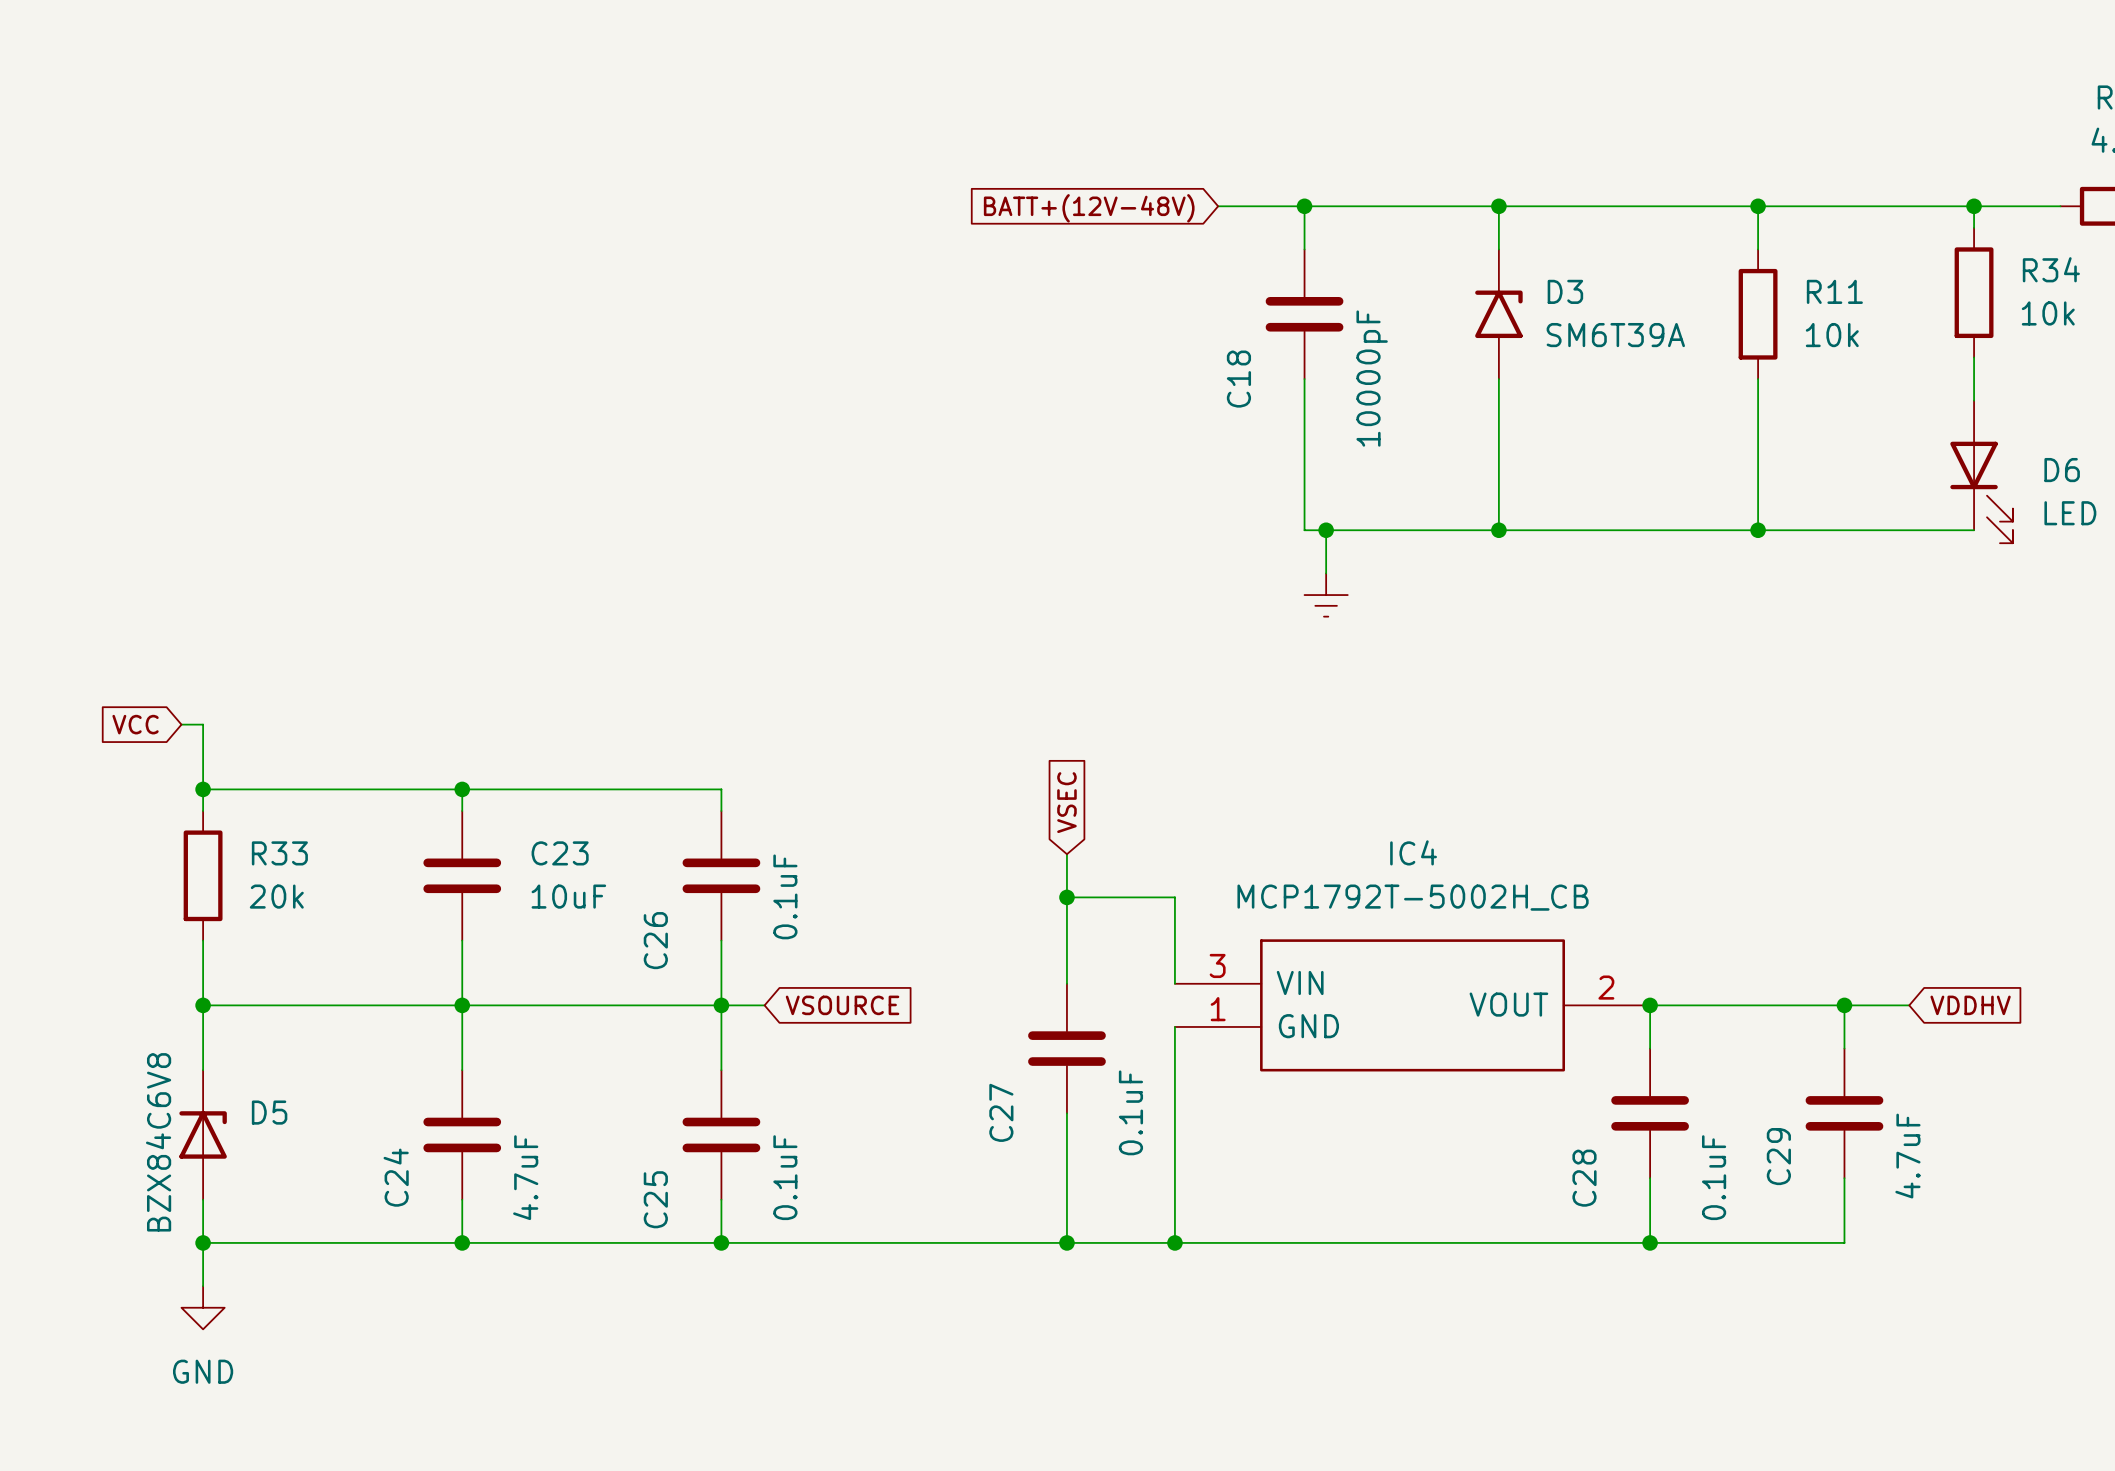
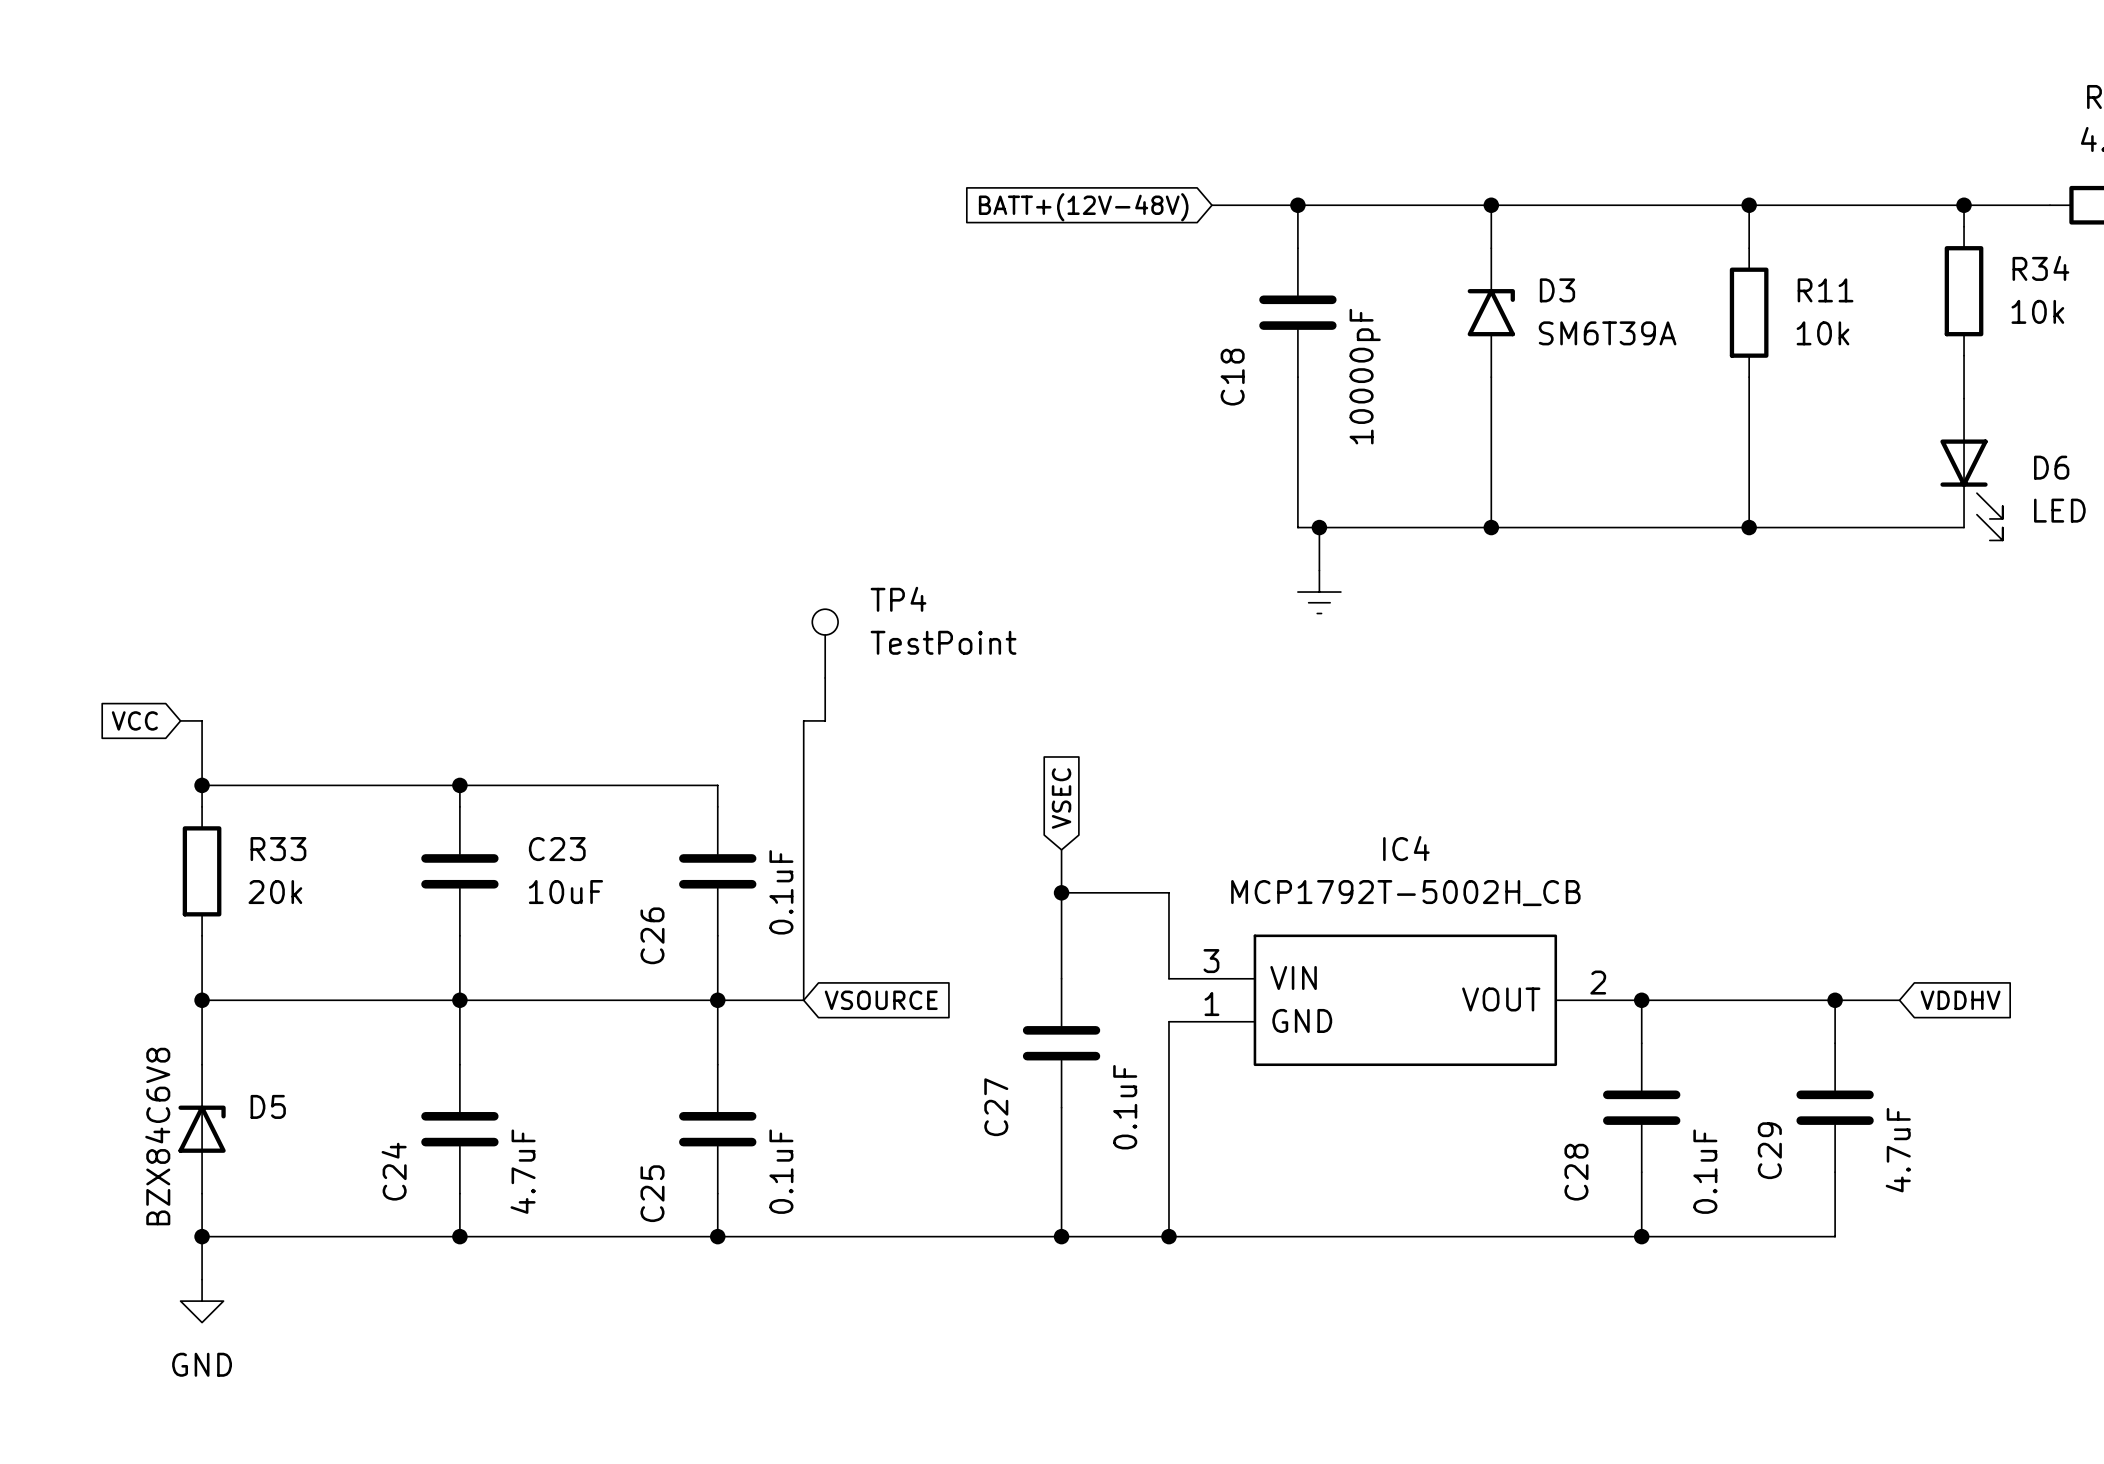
TP4: none -> TestPoint (825, 643)
wire: none -> (825, 677) (825, 720) (803, 720) (803, 1000) (760, 1000)
global label position: VSOURCE (842, 1005) -> VSOURCE (881, 1000)

